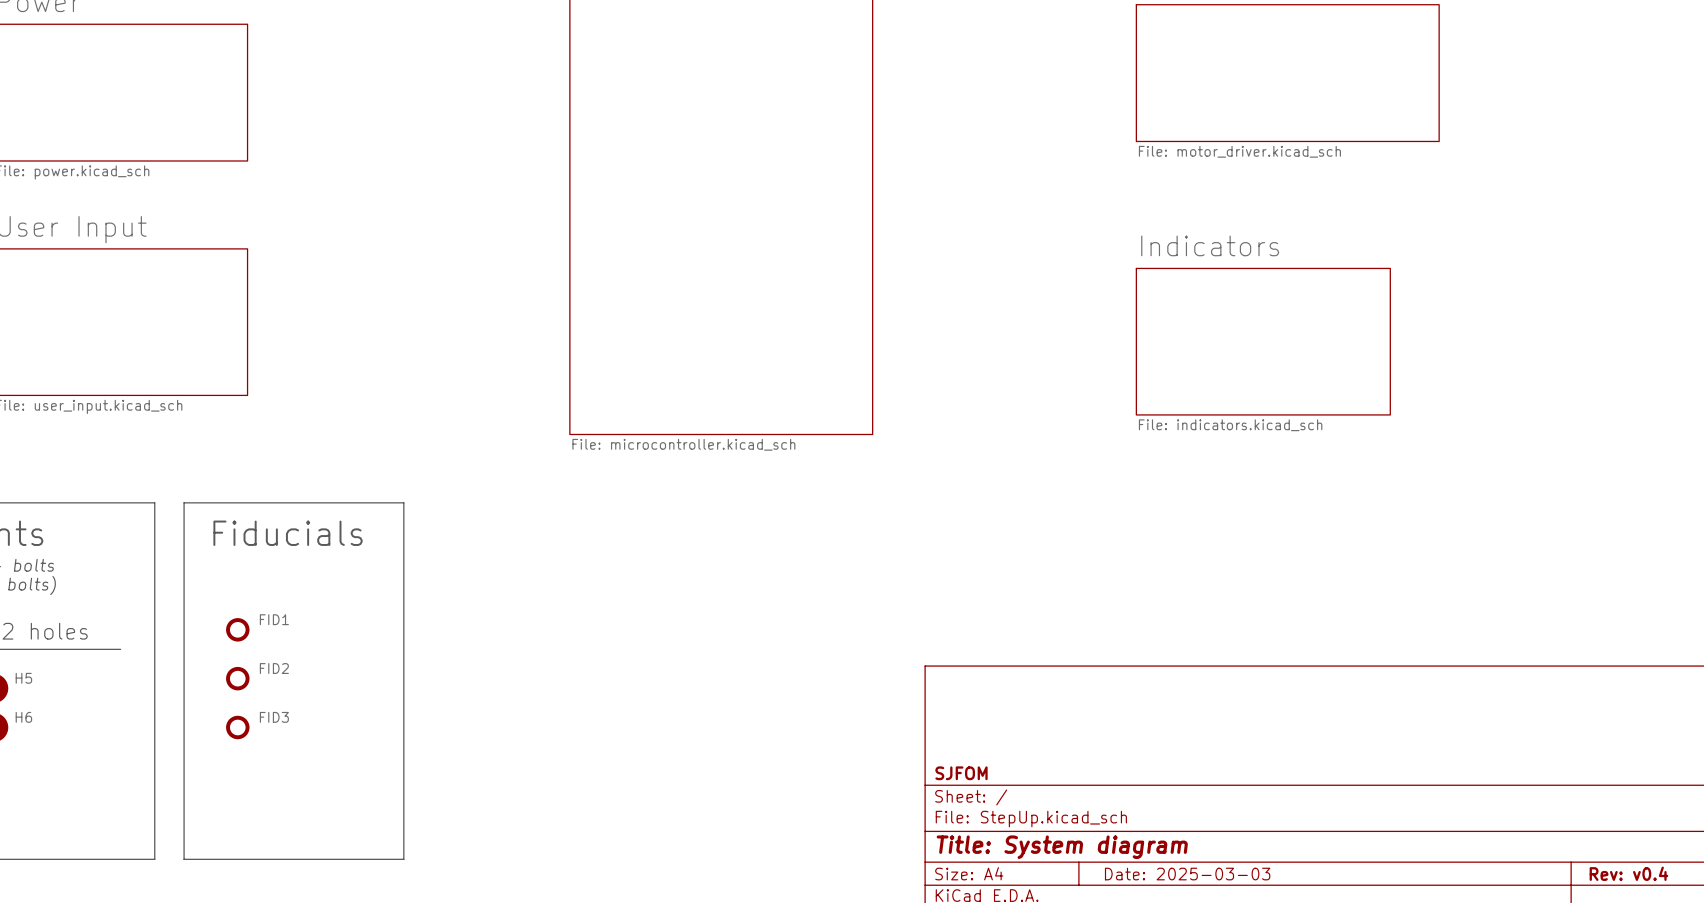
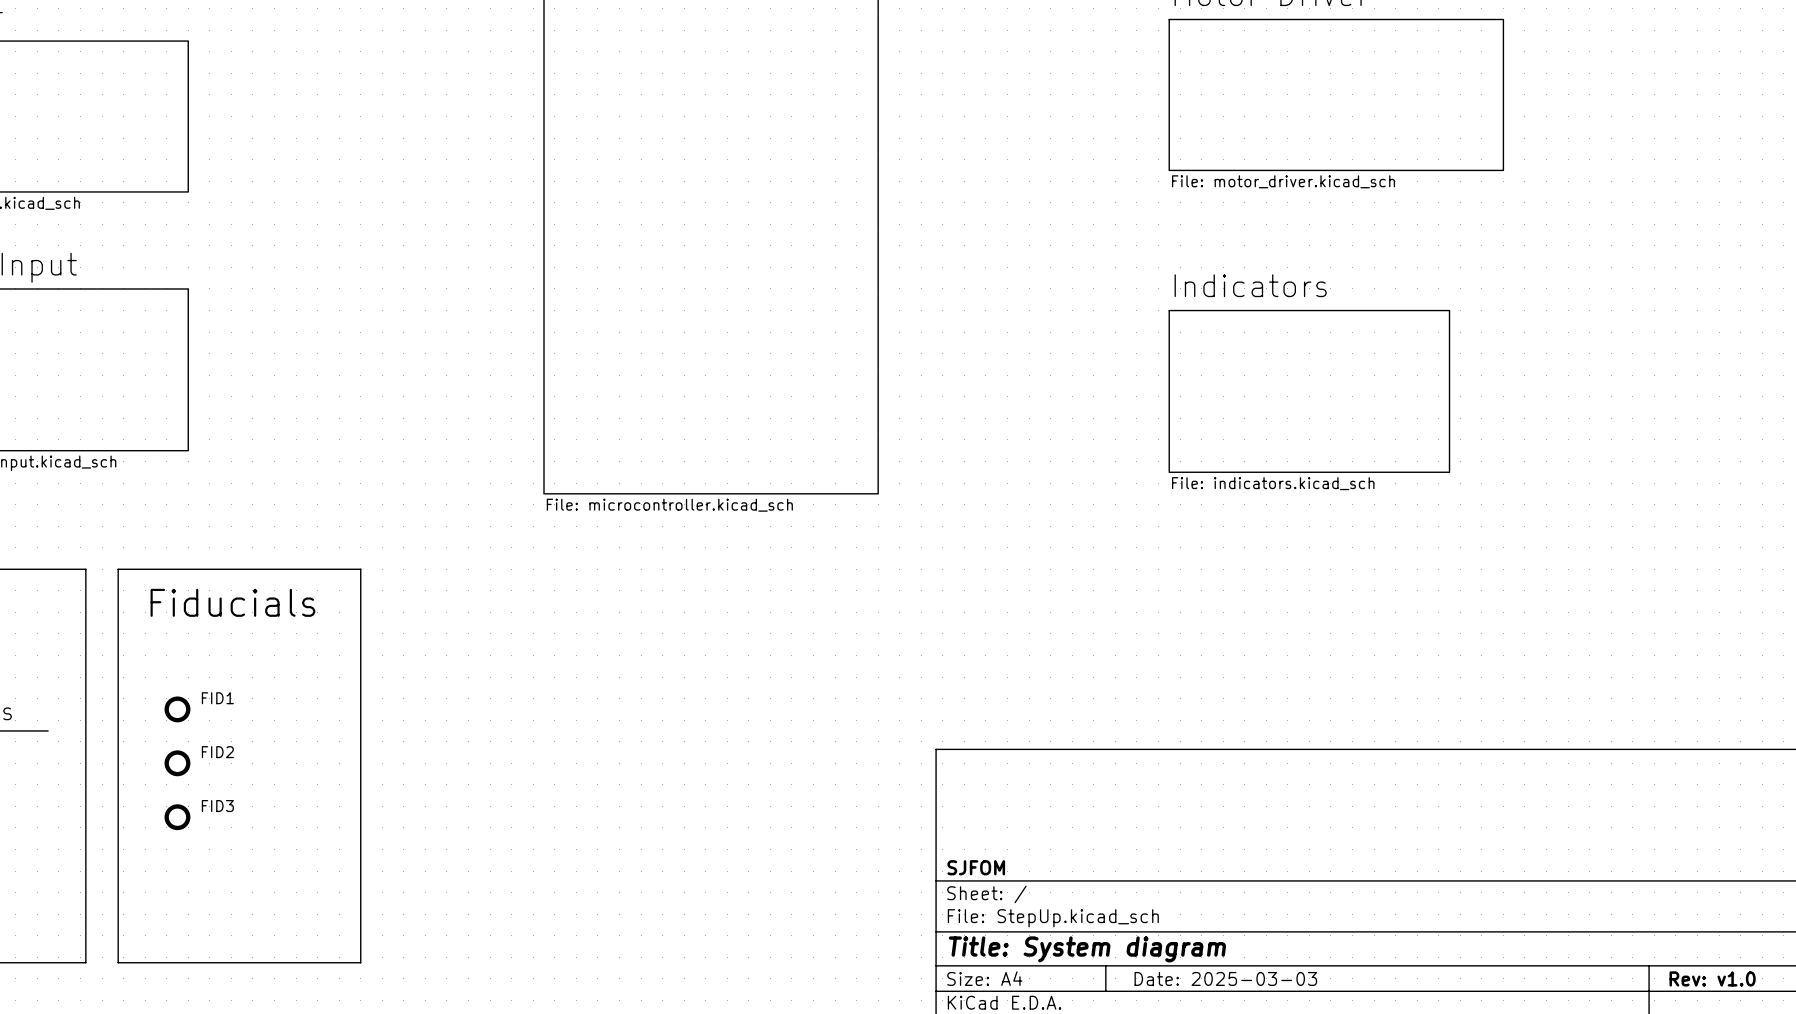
title block: Rev: v0.4 (1628, 873) -> Rev: v1.0 (1712, 978)

